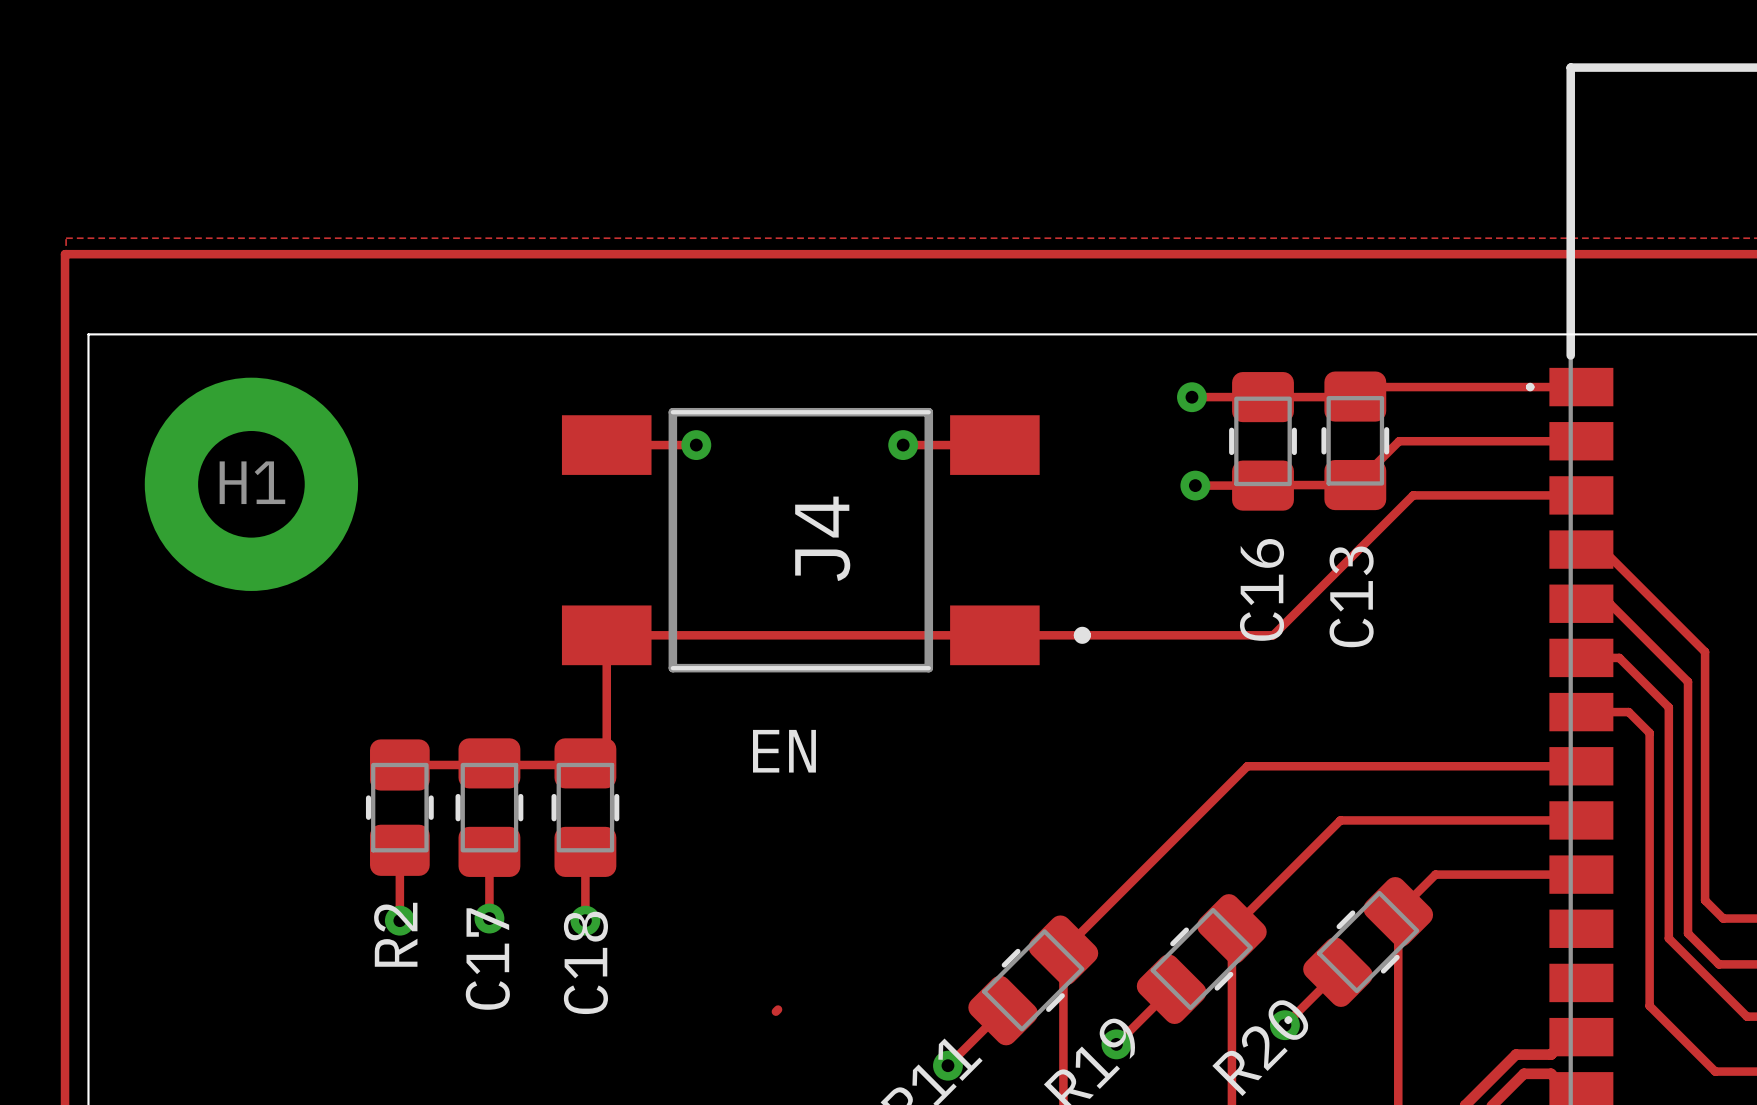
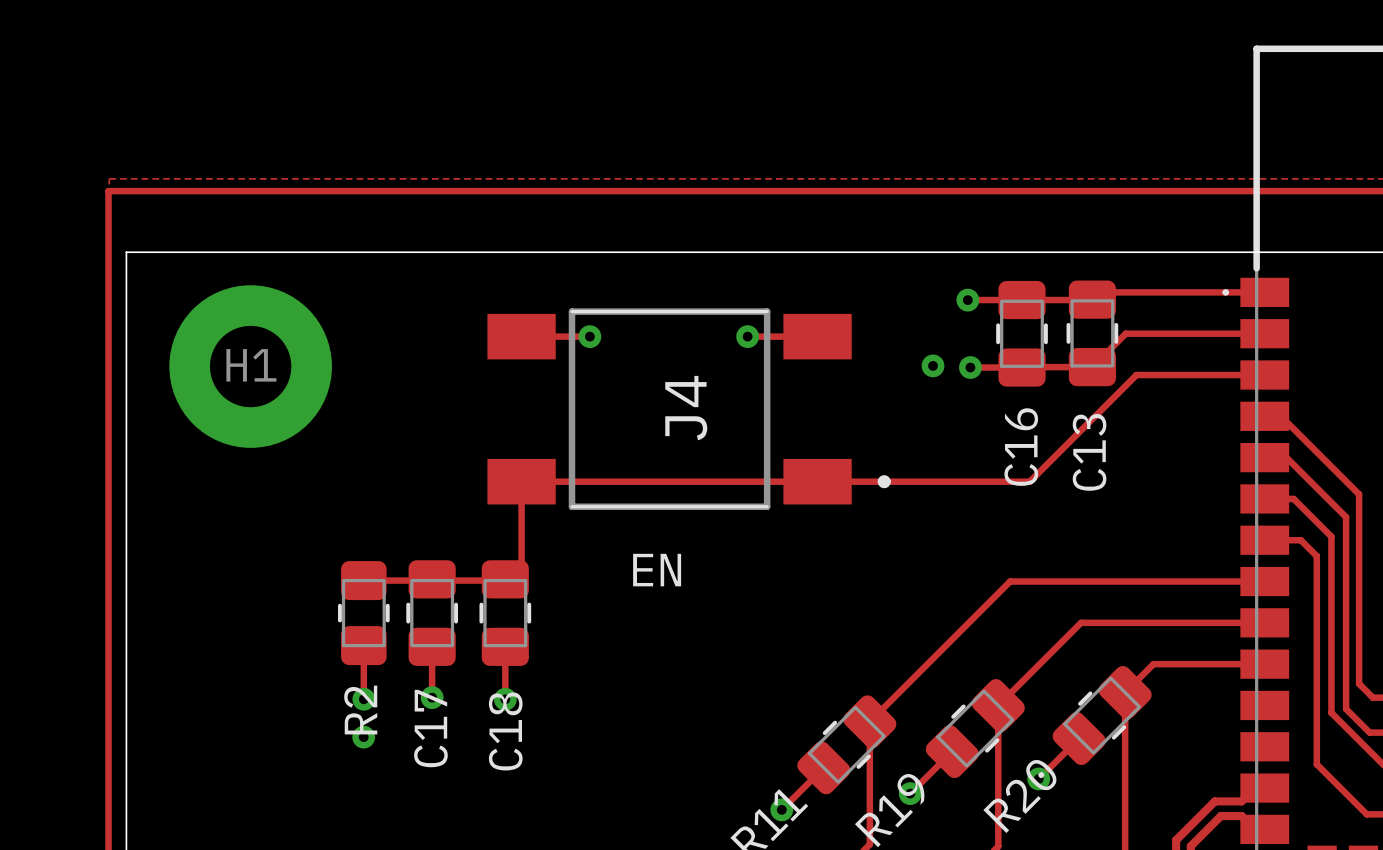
via: none -> (933, 365)
via: none -> (363, 737)
track: (778, 1009) (775, 1011) -> none

